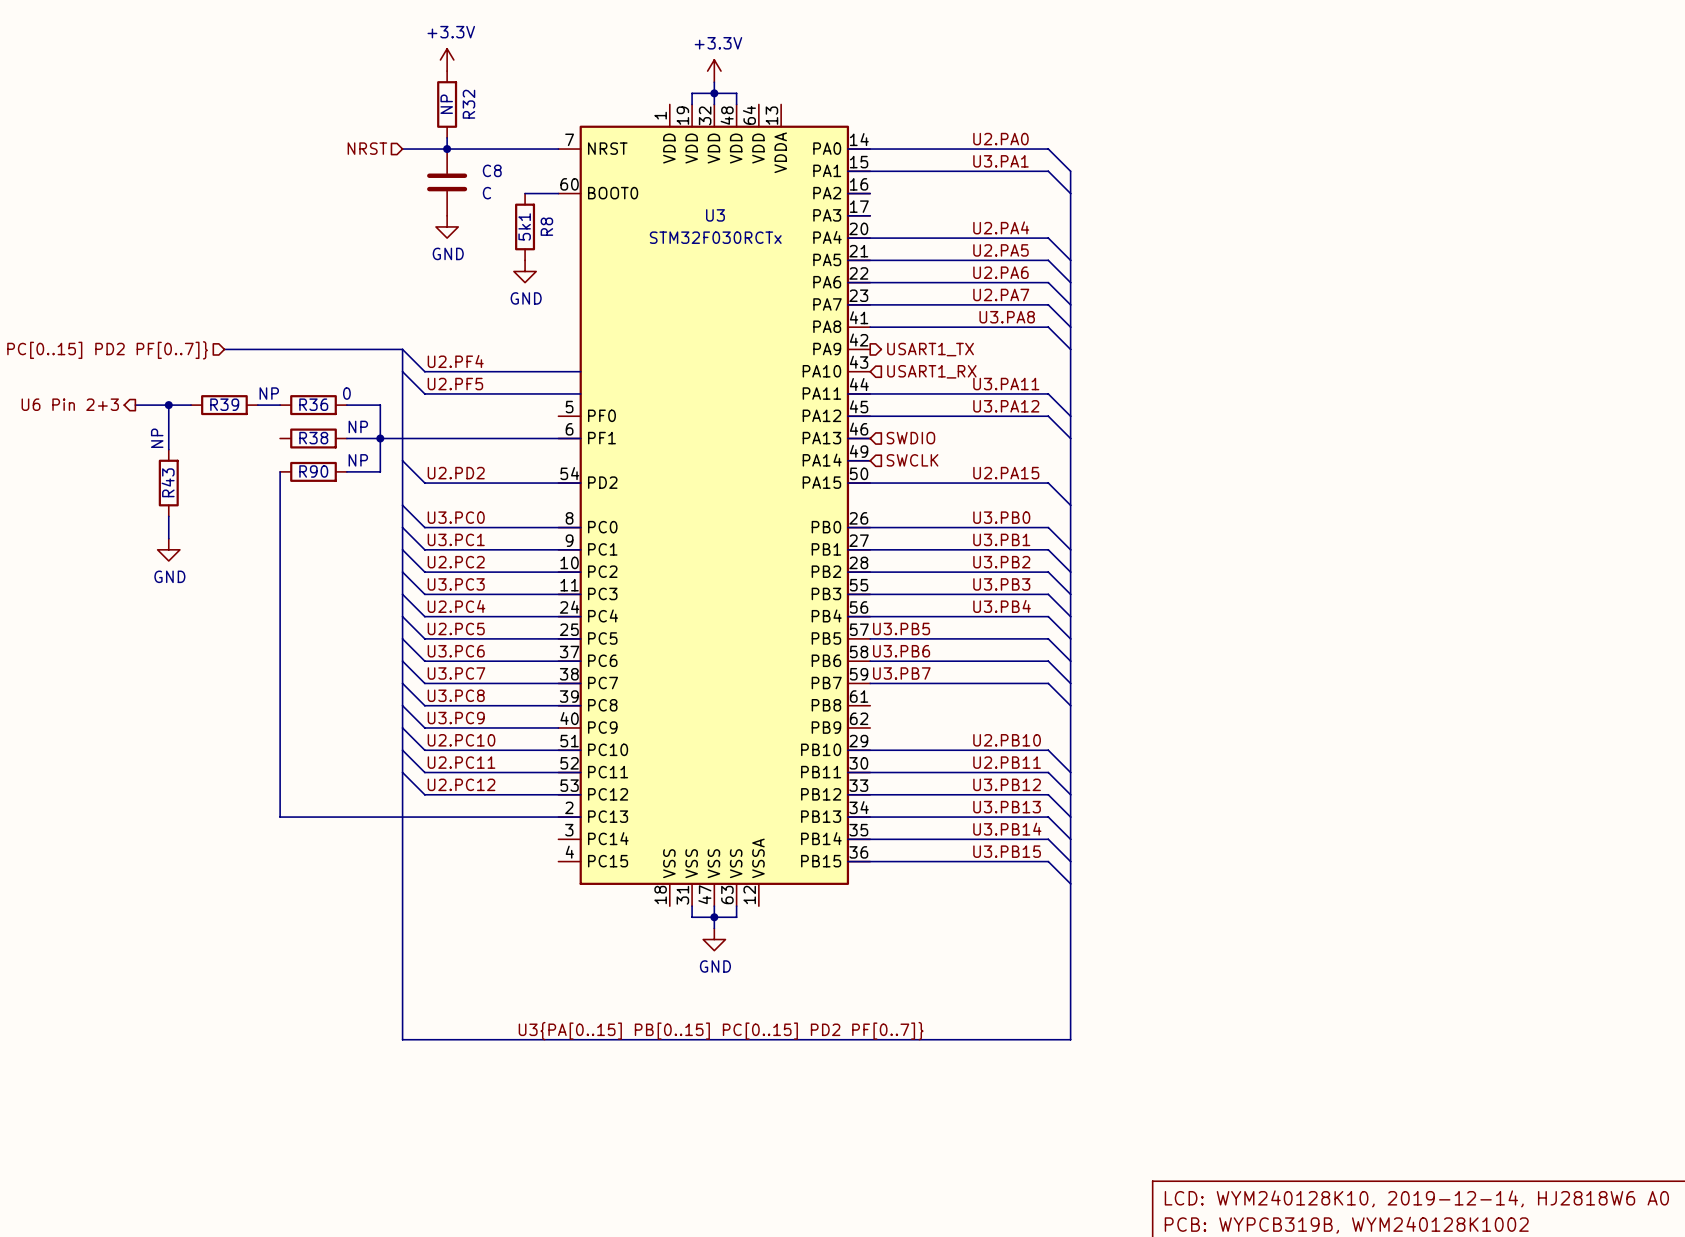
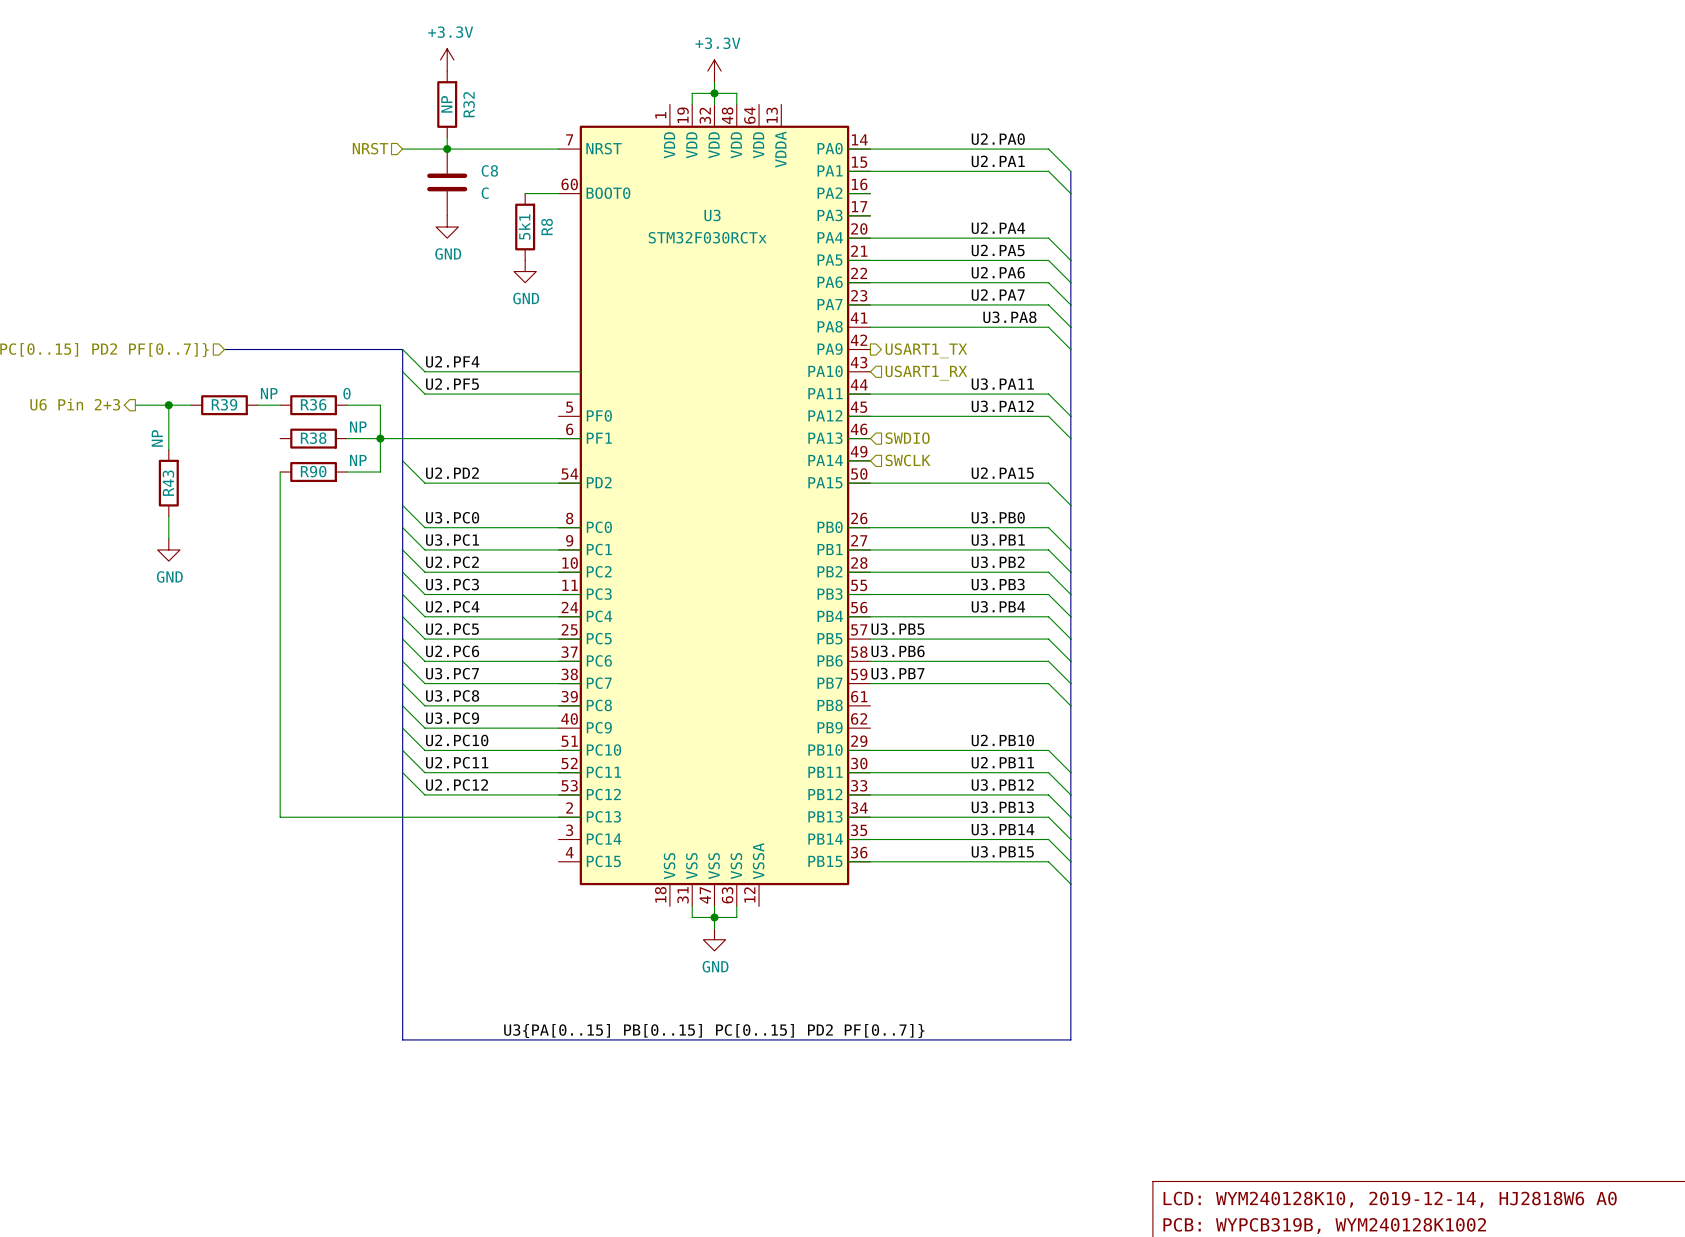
label: U3.PA1 (1000, 161) -> U2.PA1 (998, 161)
label: U3.PC6 (456, 651) -> U2.PC6 (452, 651)

